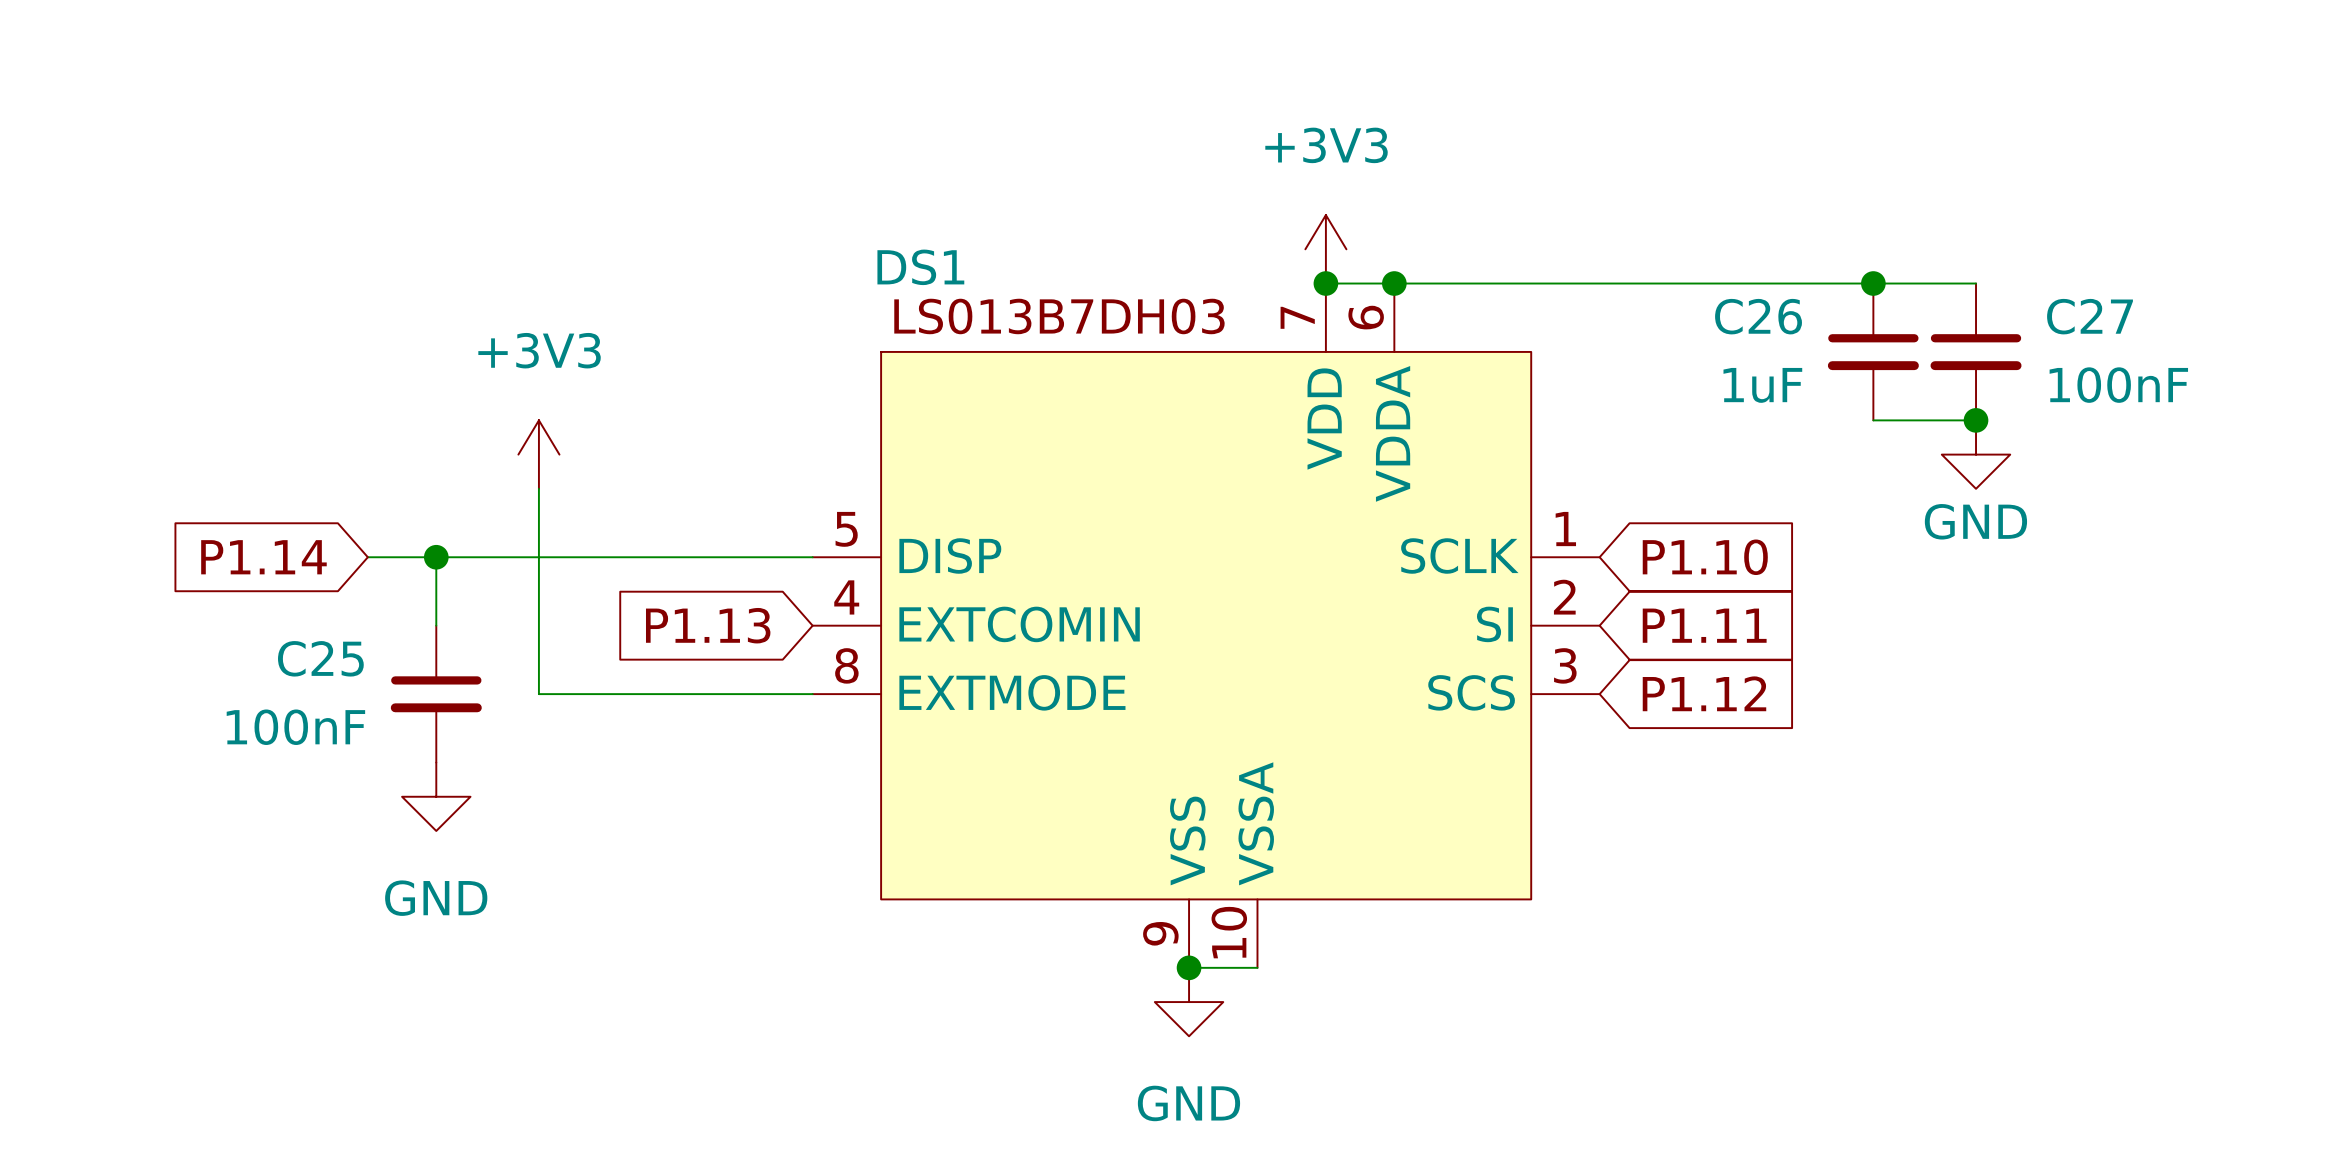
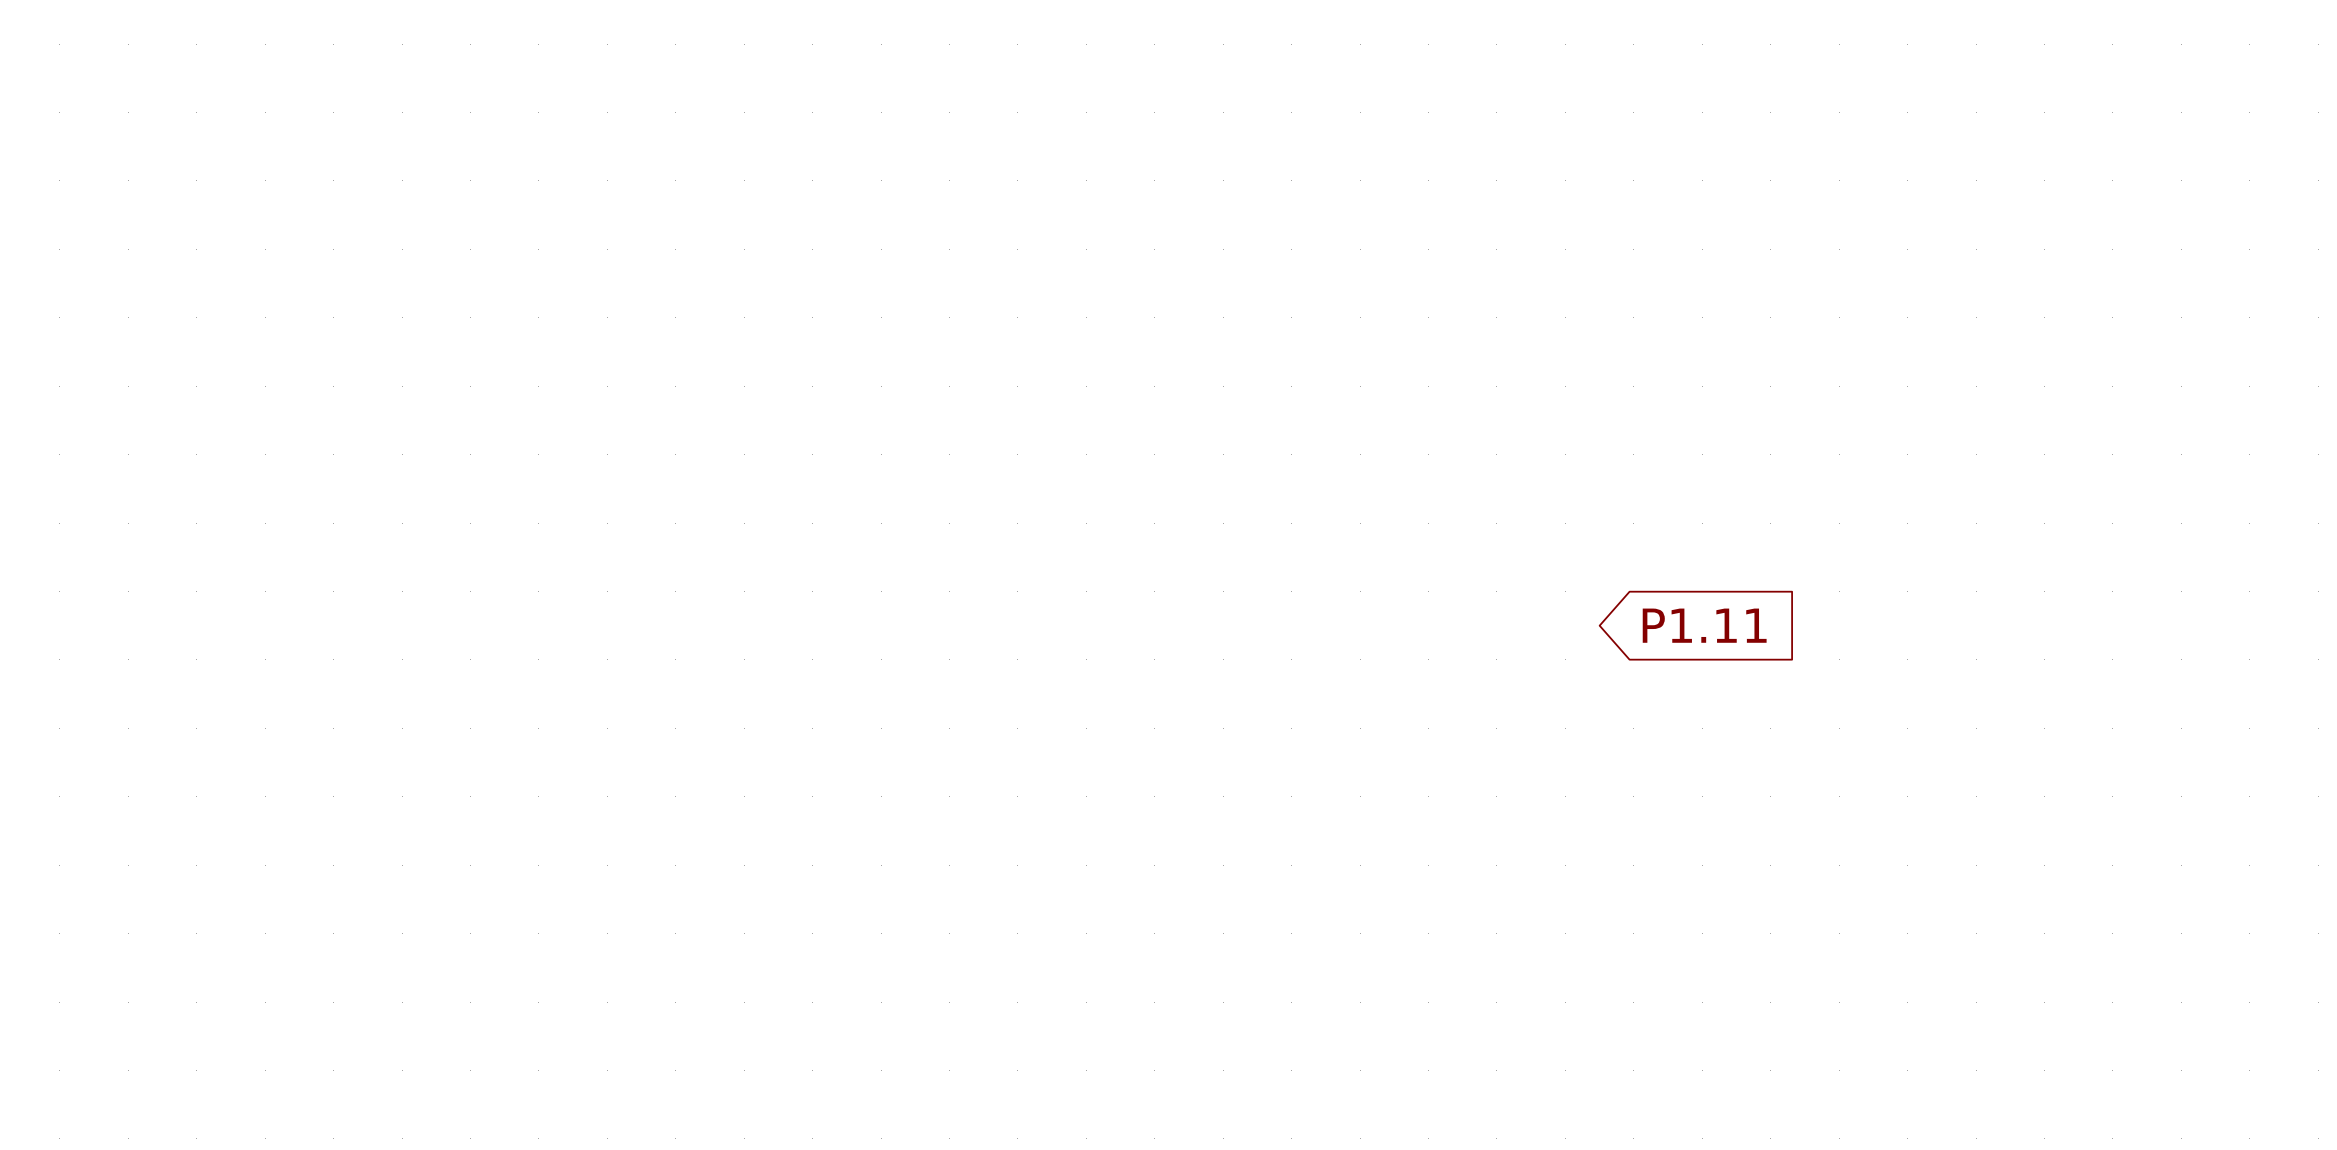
power symbol: +3V3 (1325, 249) -> none
wire: (1325, 283) (1976, 283) -> none
junction: (1325, 283) -> none
junction: (1394, 283) -> none
junction: (1873, 283) -> none
C26: 1uF (1873, 351) -> none
C27: 100nF (1976, 351) -> none
wire: (1873, 420) (1976, 420) -> none
junction: (1976, 420) -> none
power symbol: +3V3 (538, 454) -> none
power symbol: GND (1976, 454) -> none
wire: (538, 488) (538, 694) (812, 694) -> none
global label: P1.14 (263, 557) -> none
wire: (367, 557) (812, 557) -> none
wire: (436, 557) (436, 625) -> none
junction: (436, 557) -> none
global label: P1.10 (1705, 557) -> none
global label: P1.13 (708, 625) -> none
DS1: (1206, 625) -> none
global label: P1.12 (1704, 693) -> none
C25: 100nF (436, 694) -> none
power symbol: GND (436, 796) -> none
wire: (1189, 967) (1257, 967) -> none
junction: (1189, 967) -> none
power symbol: GND (1189, 1002) -> none

